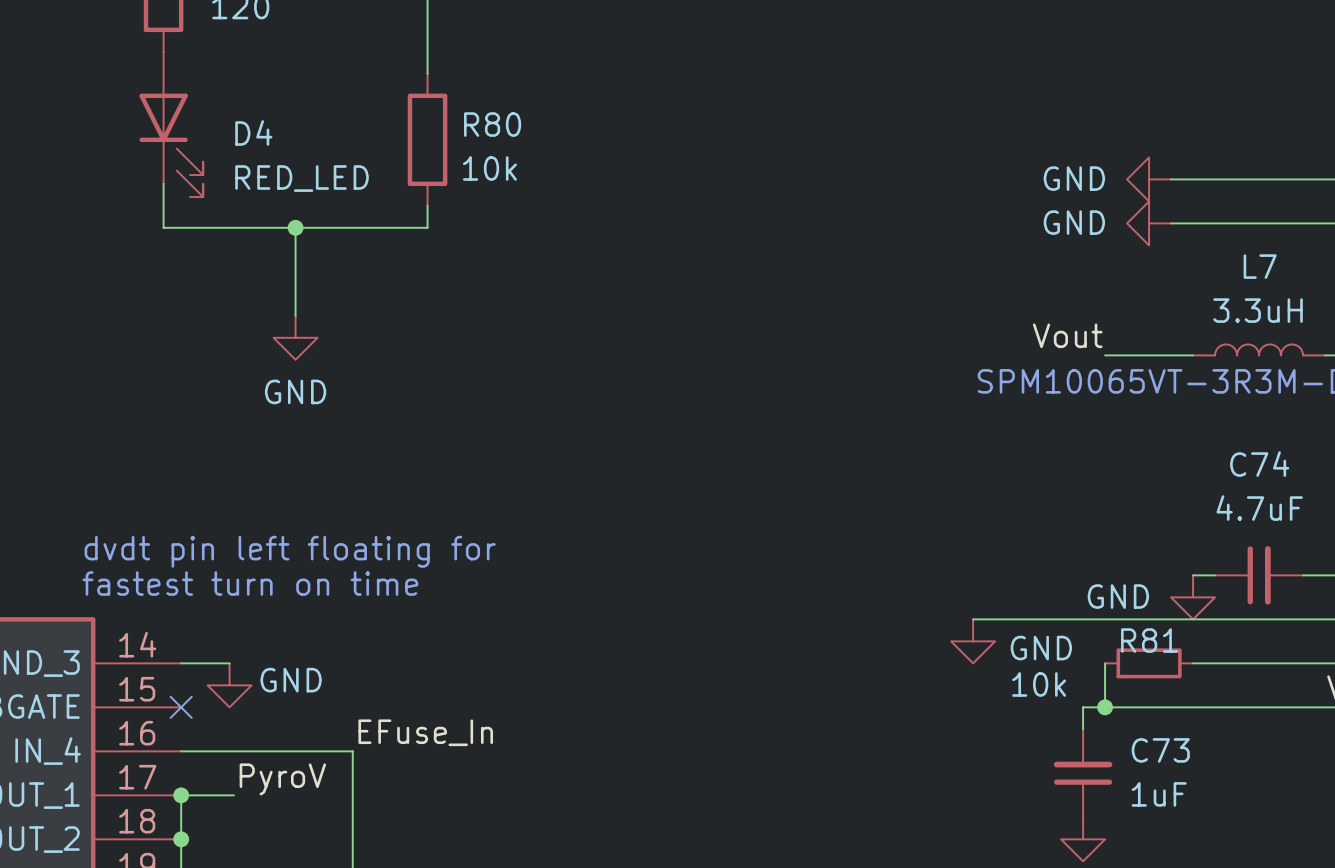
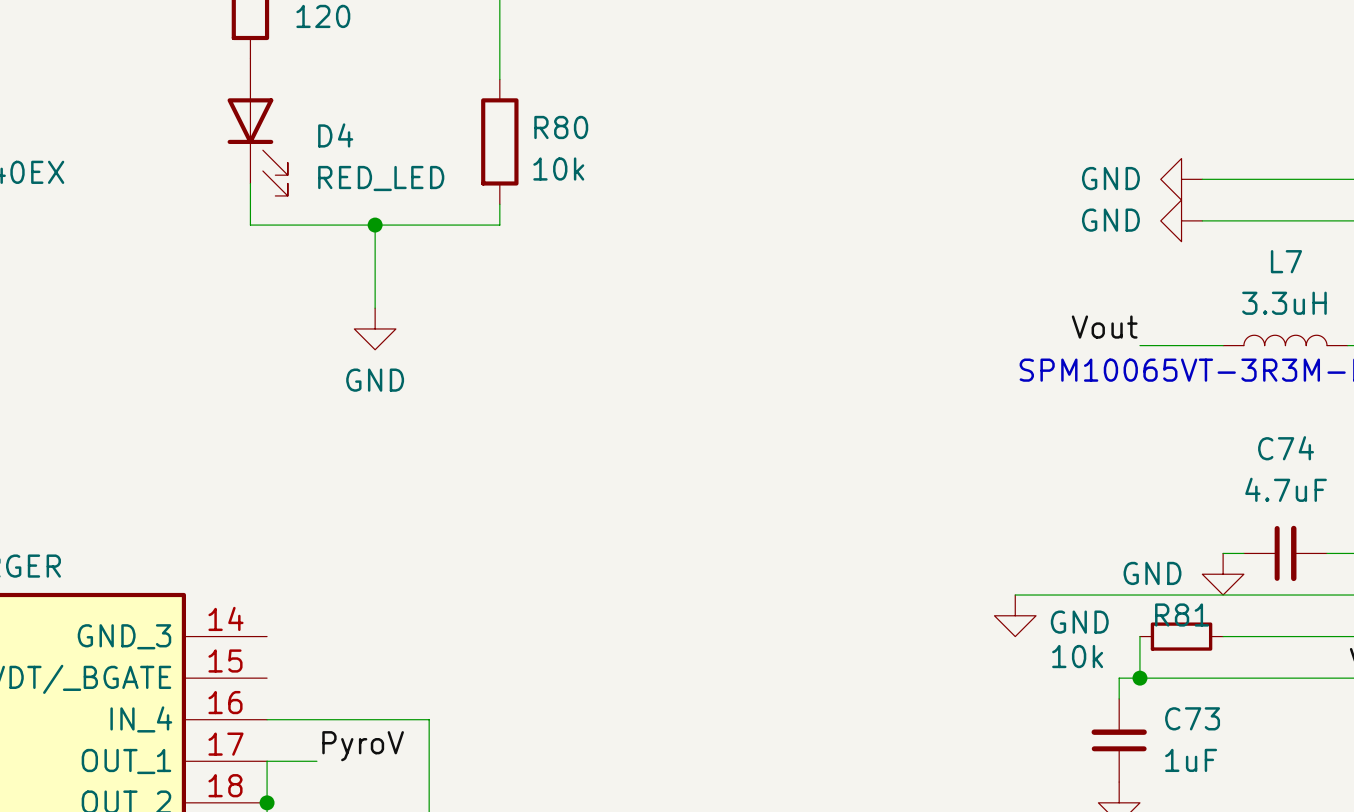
text: dvdt pin left floating for (290, 551) -> none
text: fastest turn on time (250, 583) -> none
wire: (181, 663) (229, 663) -> none
power symbol: GND (229, 685) -> none
no-connect mark: (181, 707) -> none
label: EFuse_In (425, 732) -> none
junction: (181, 795) -> none

